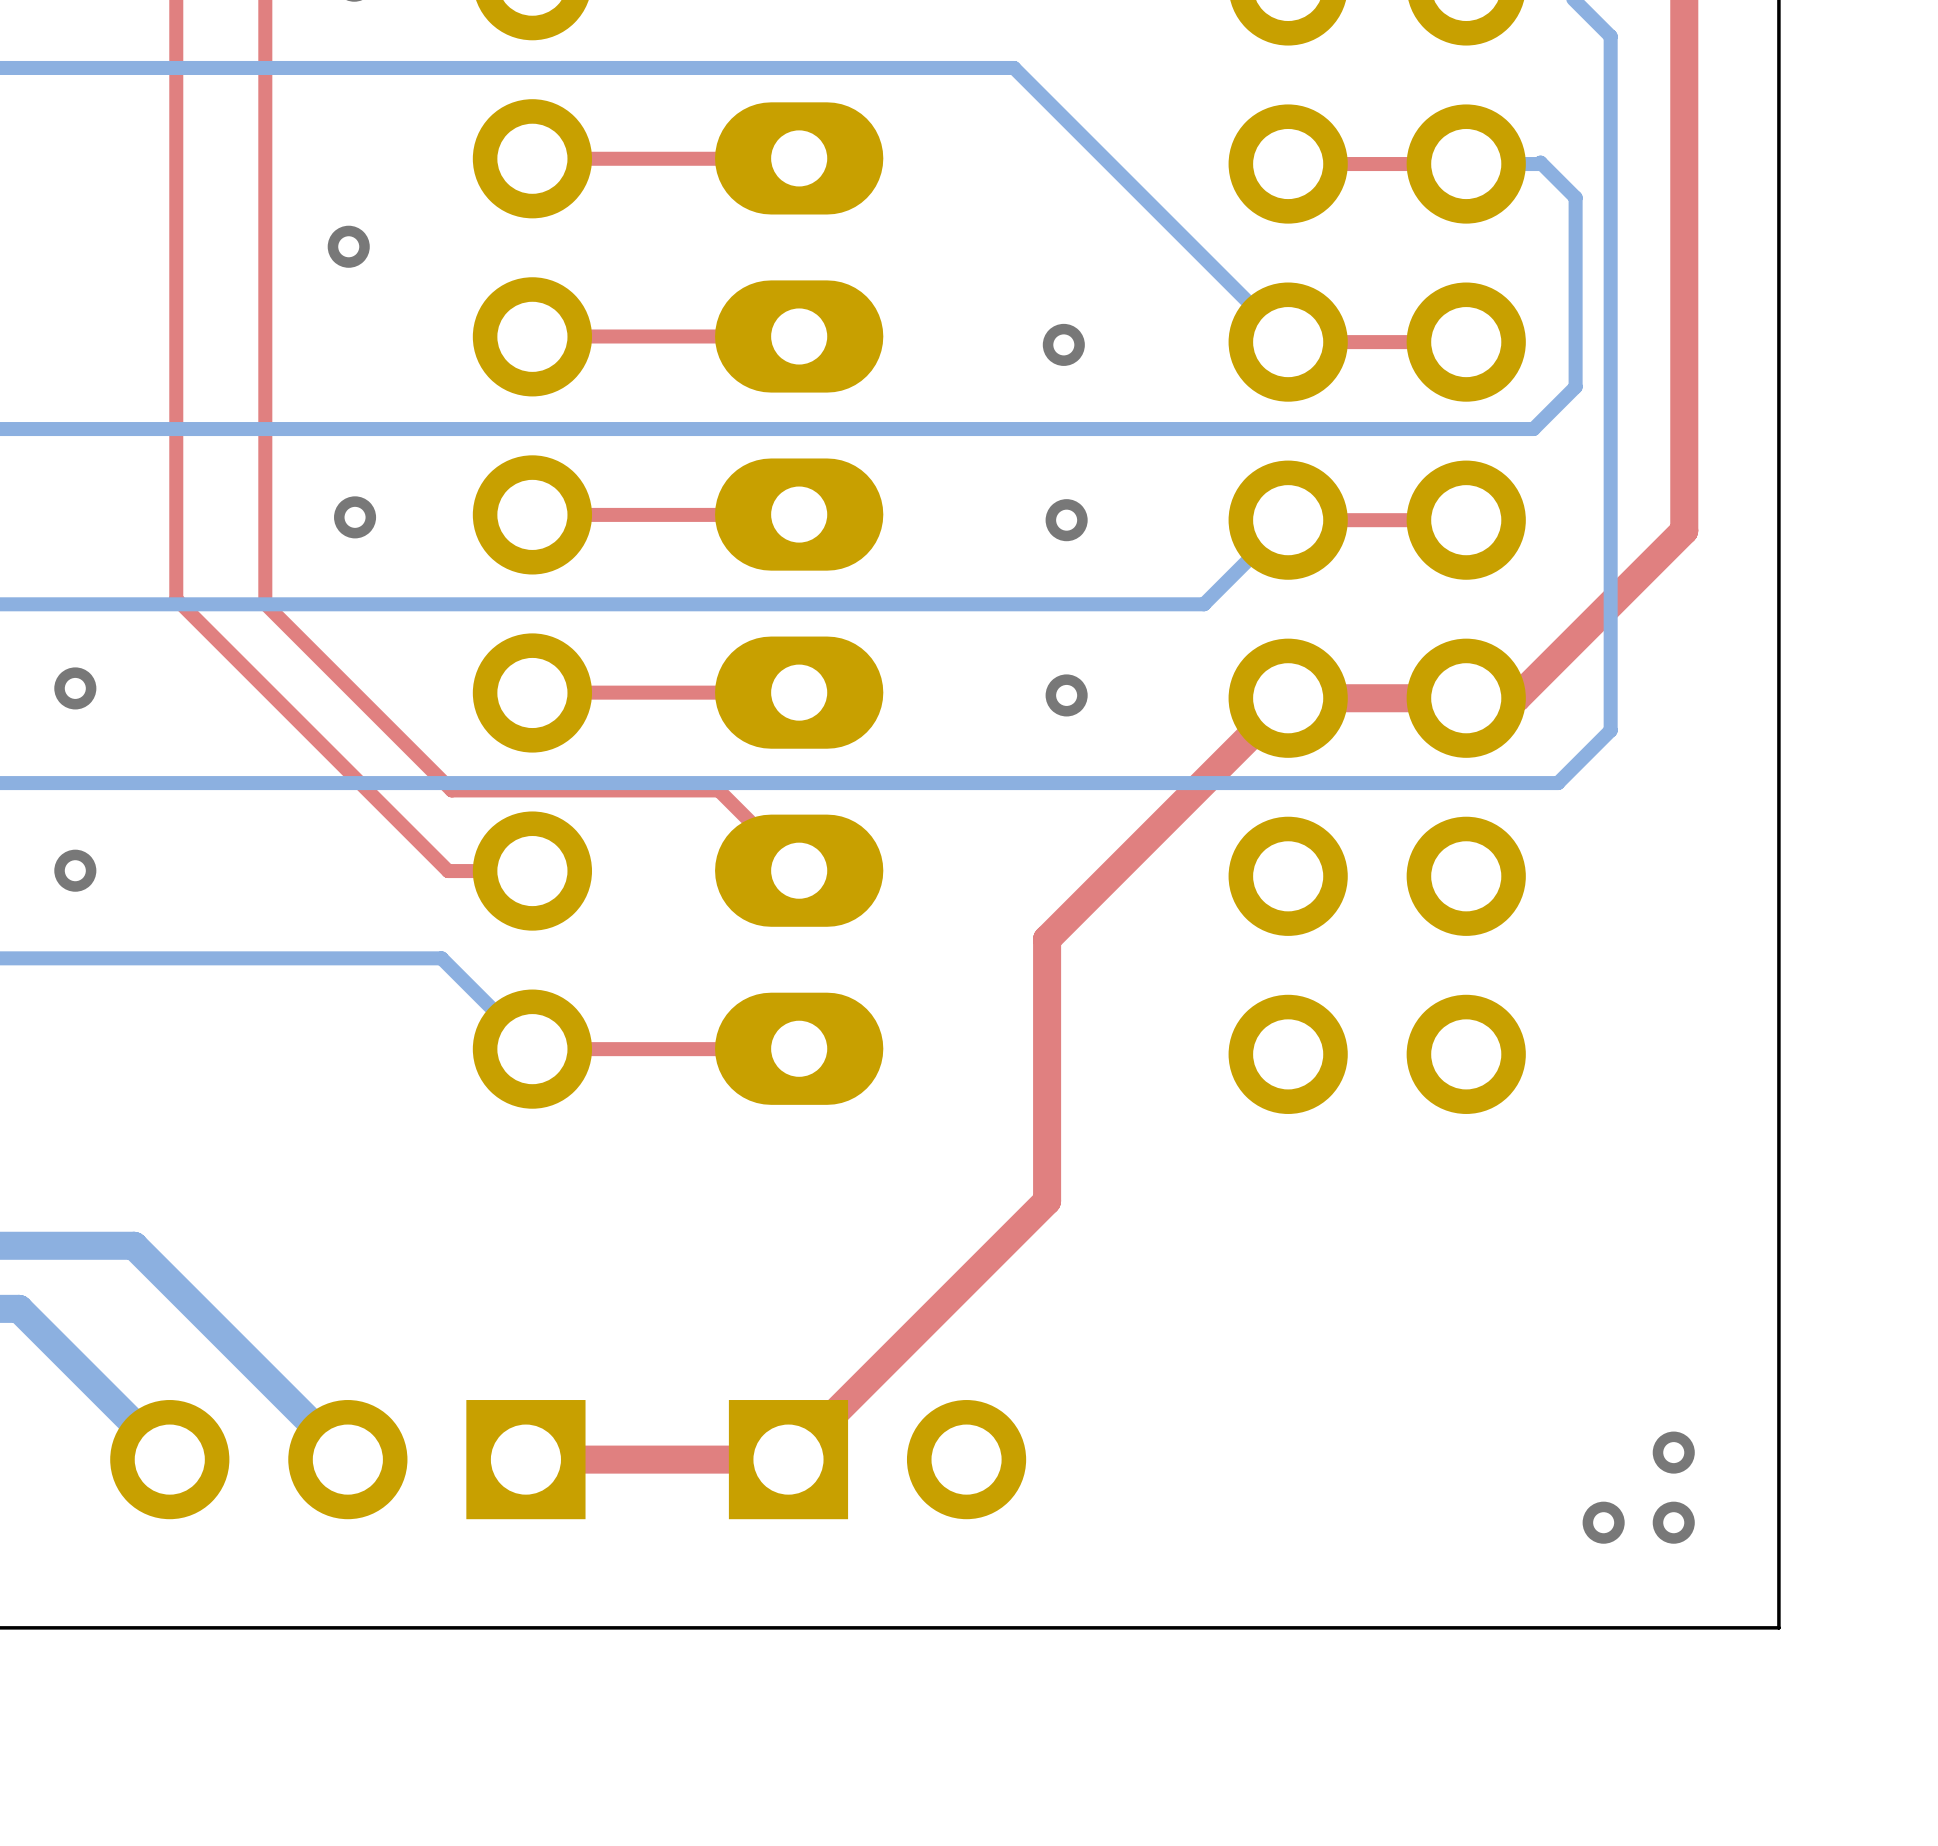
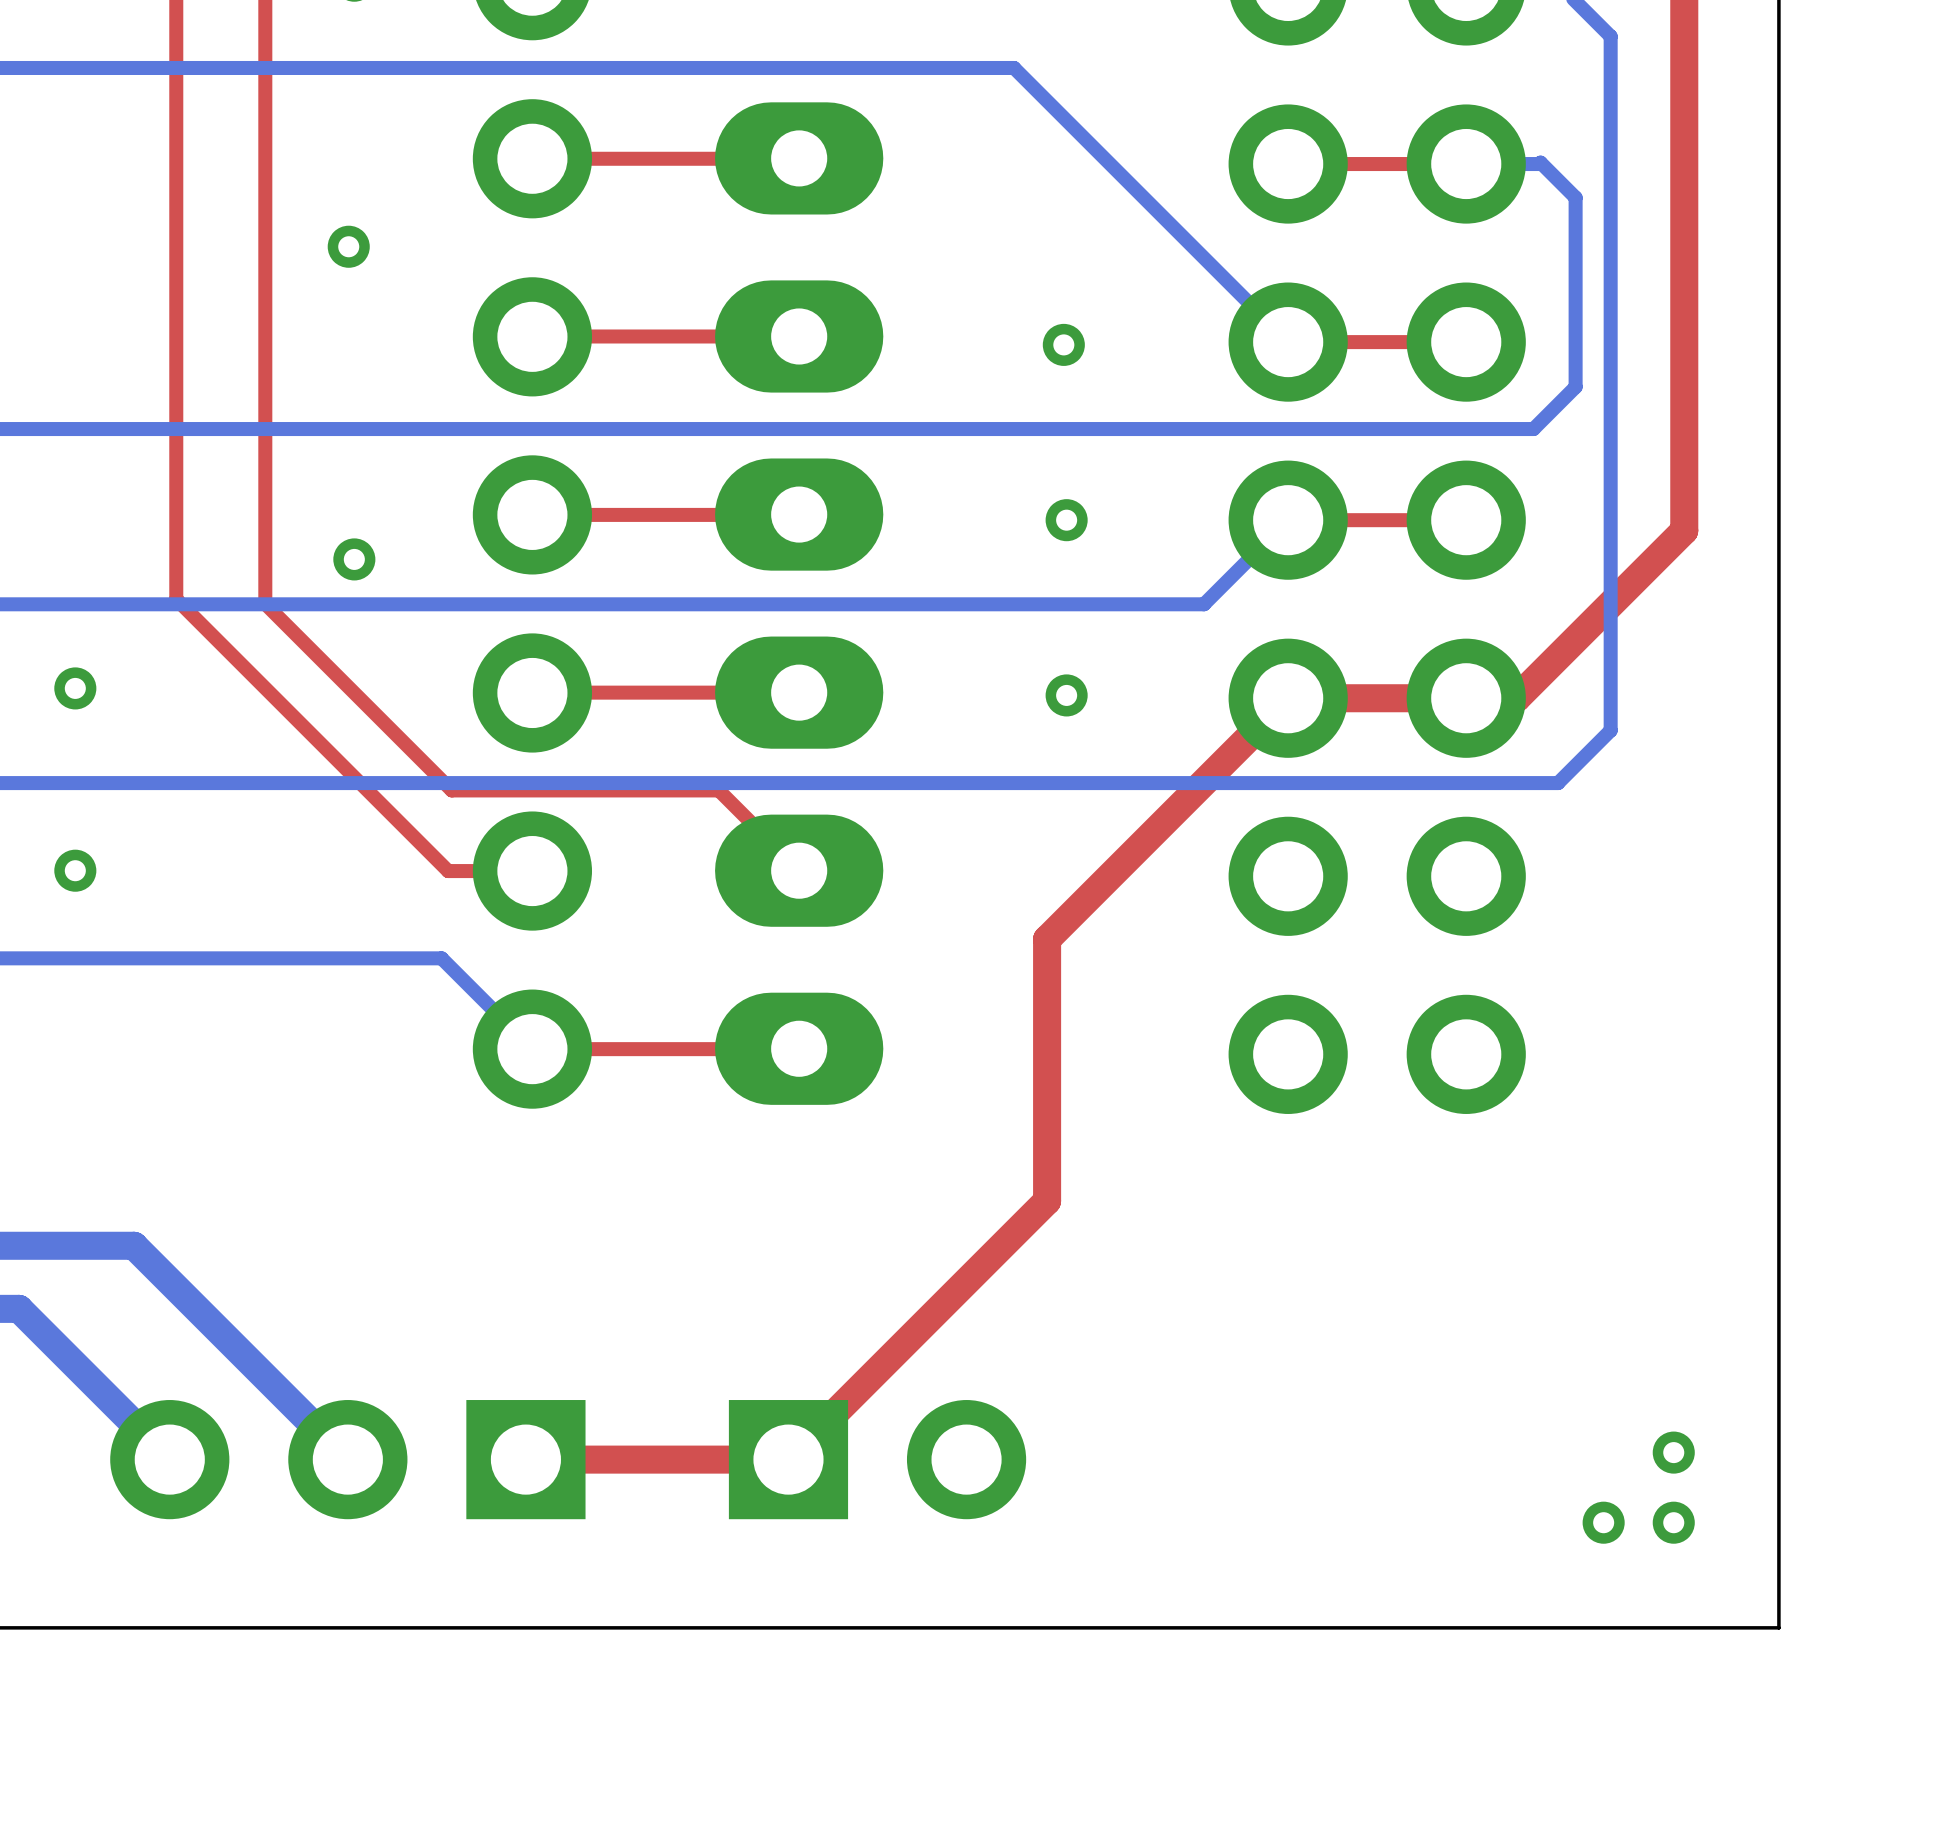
via position: (355, 517) -> (354, 559)

